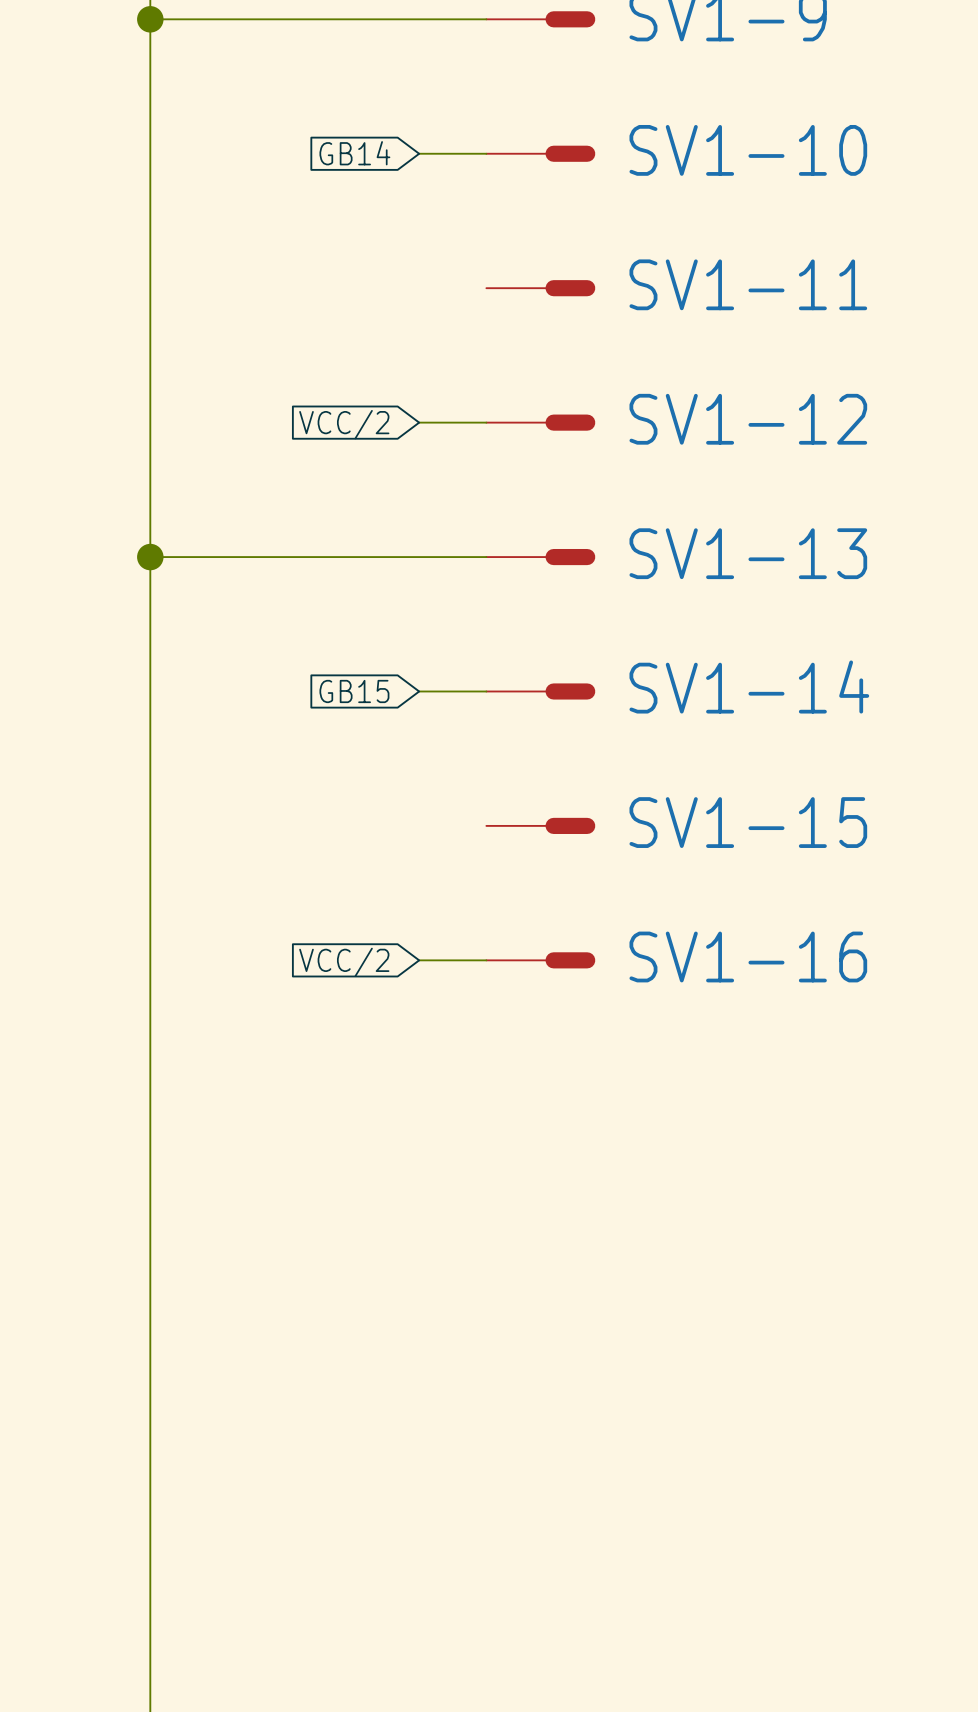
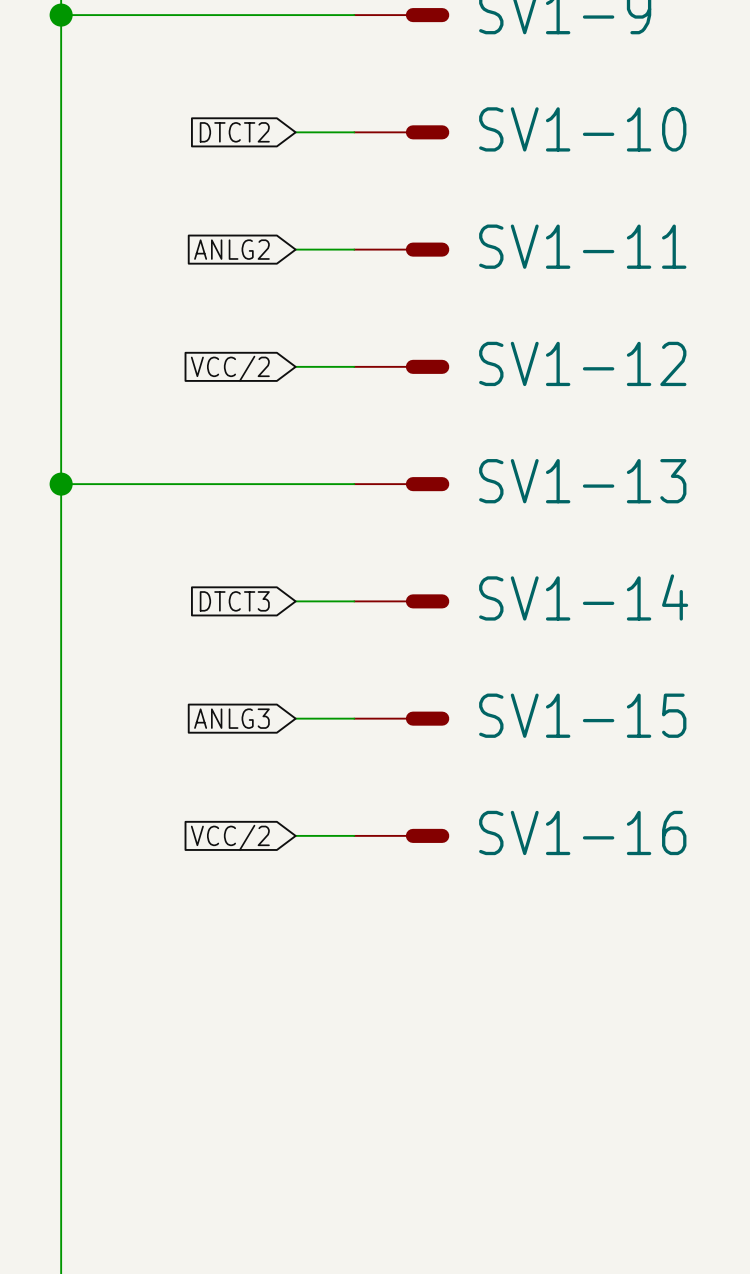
global label: GB14 (354, 153) -> DTCT2 (234, 132)
global label: none -> ANLG2 (231, 249)
wire: none -> (295, 249) (354, 249)
global label: GB15 (354, 691) -> DTCT3 (234, 601)
global label: none -> ANLG3 (231, 718)
wire: none -> (295, 718) (354, 718)

